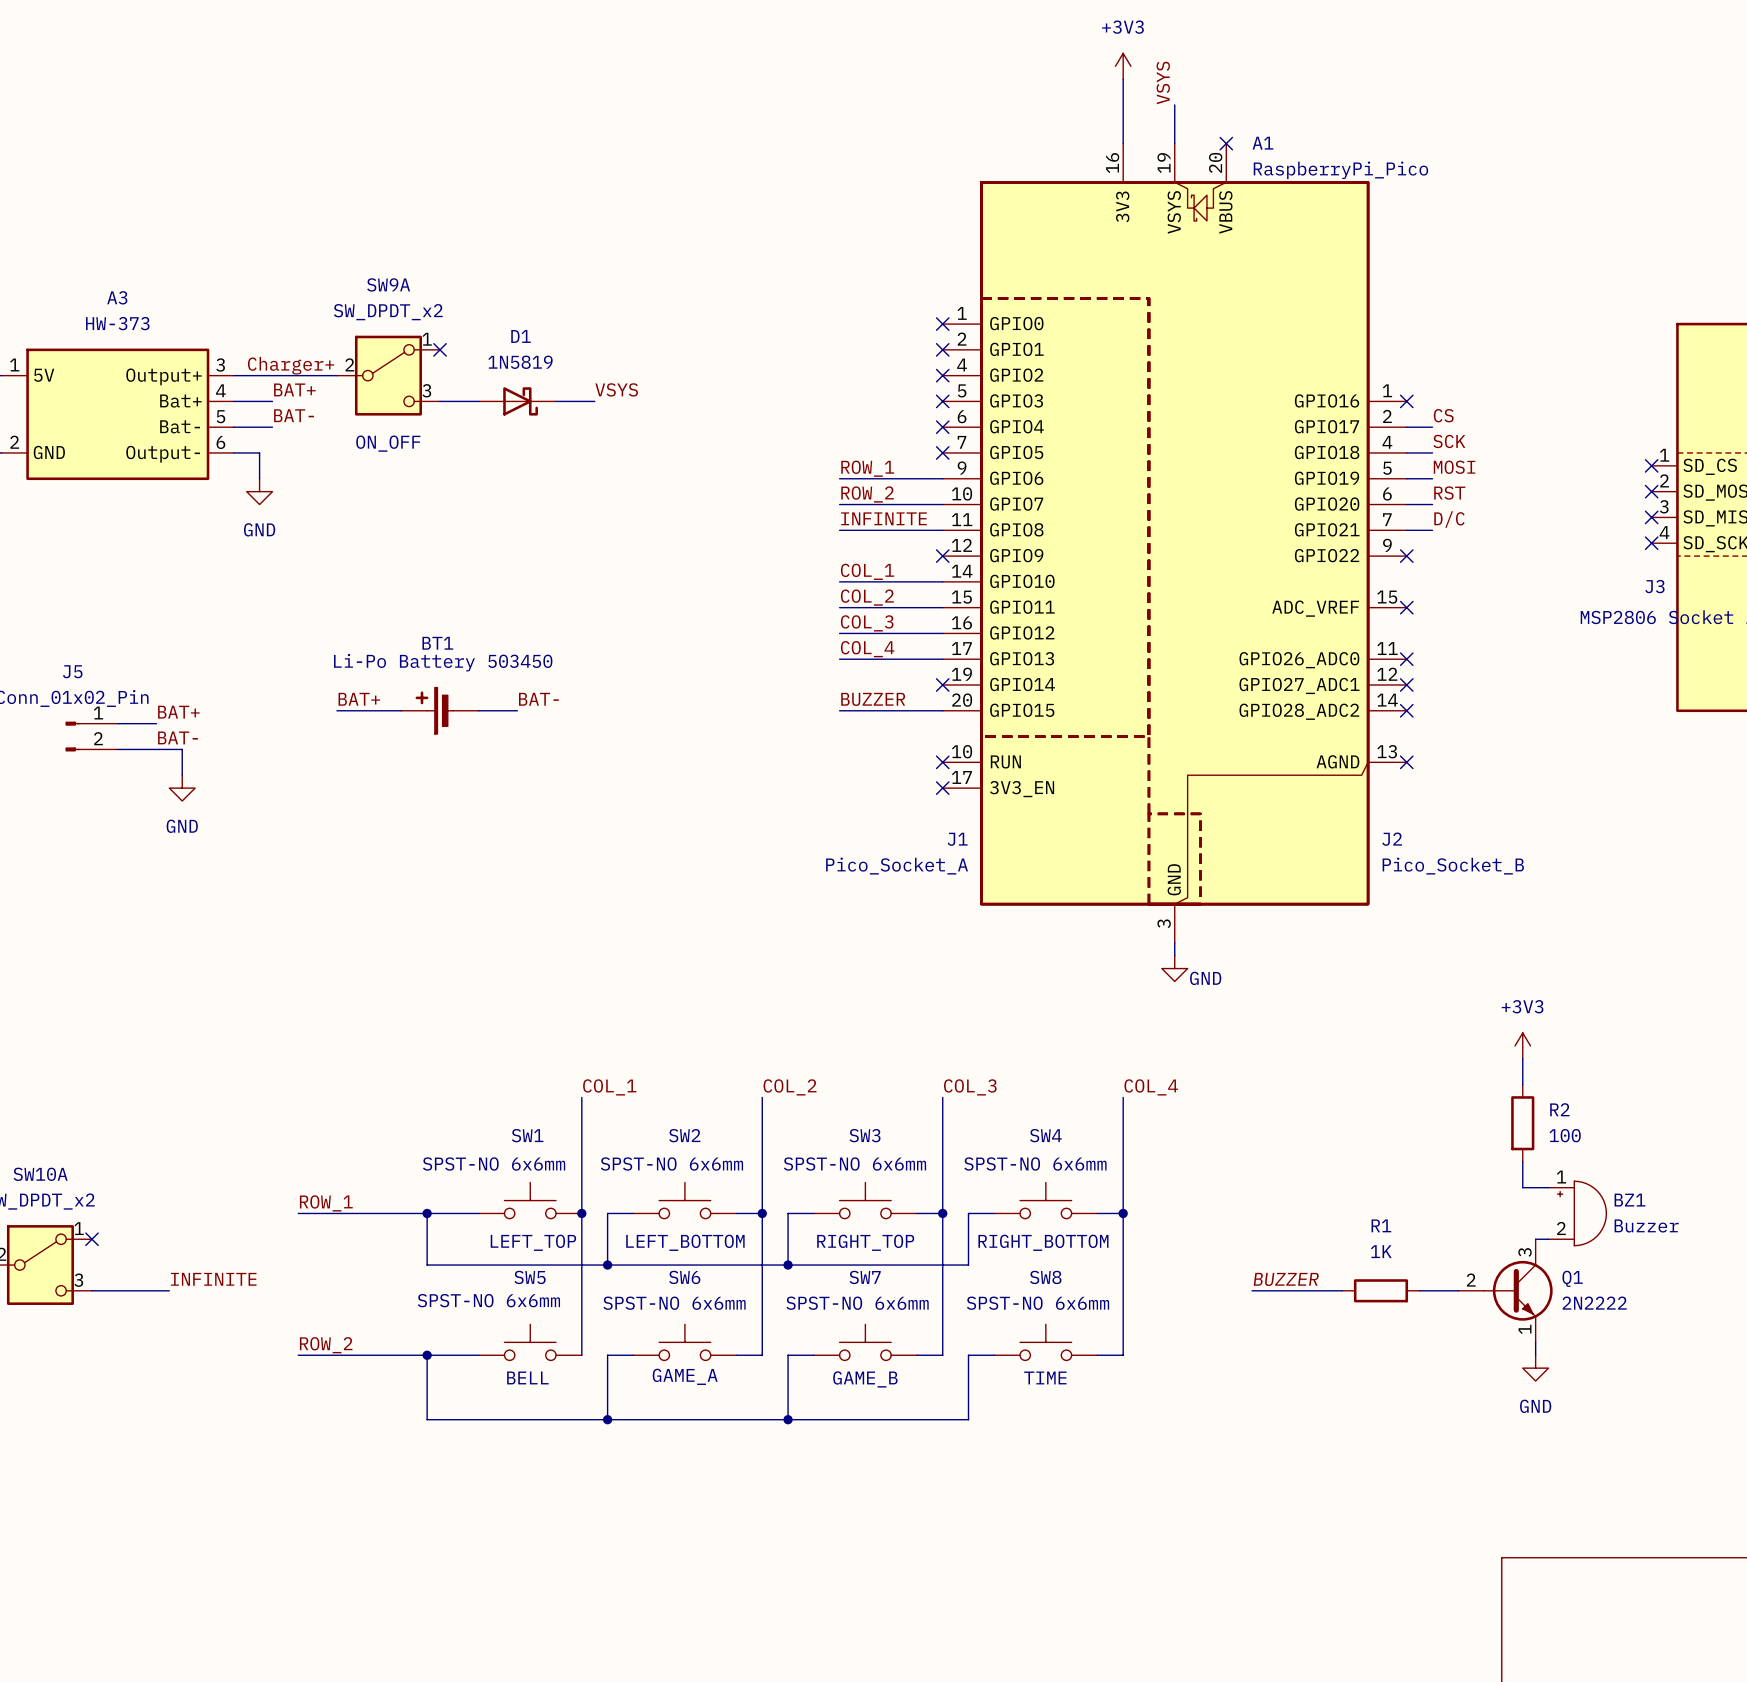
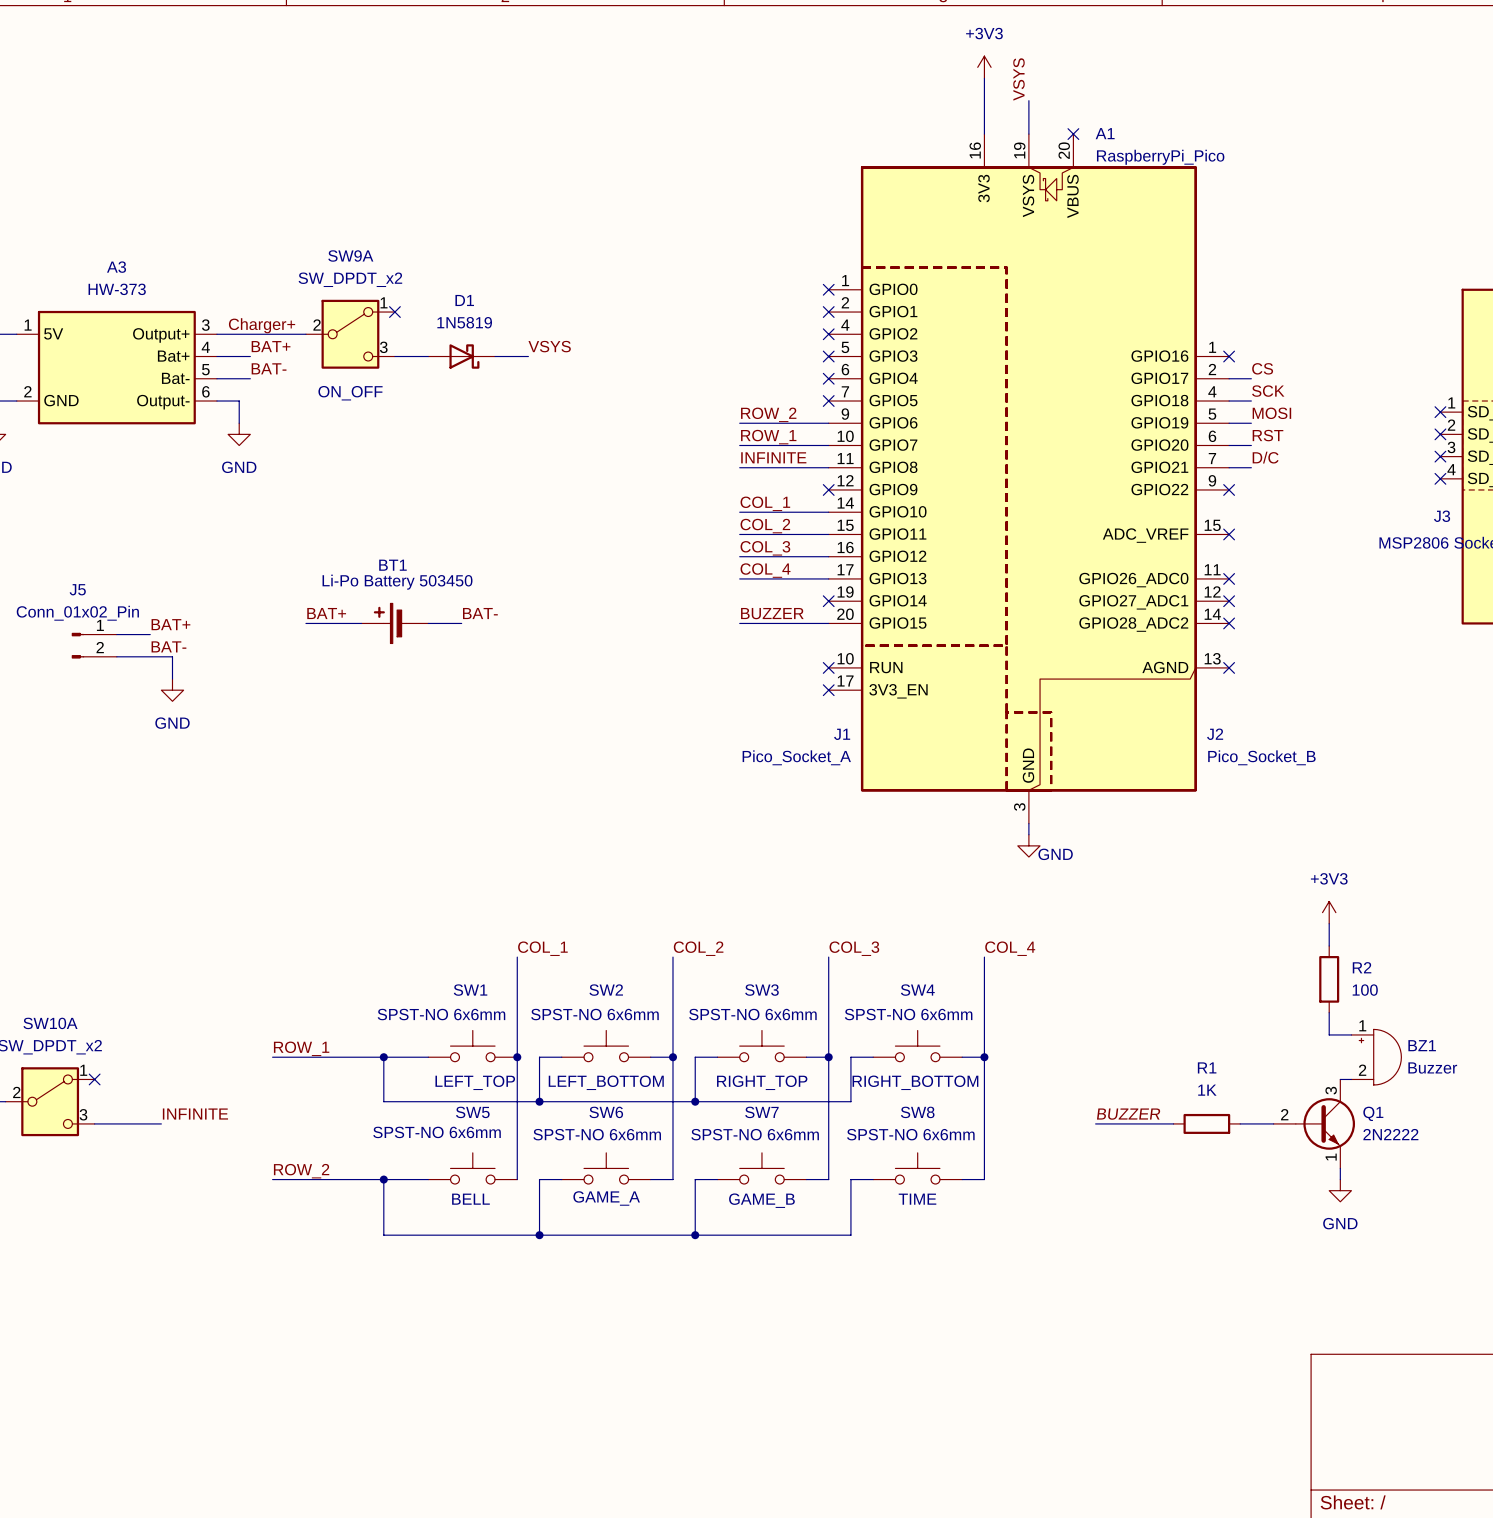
label: ROW_1 (867, 468) -> ROW_2 (768, 414)
label: ROW_2 (867, 494) -> ROW_1 (768, 437)

